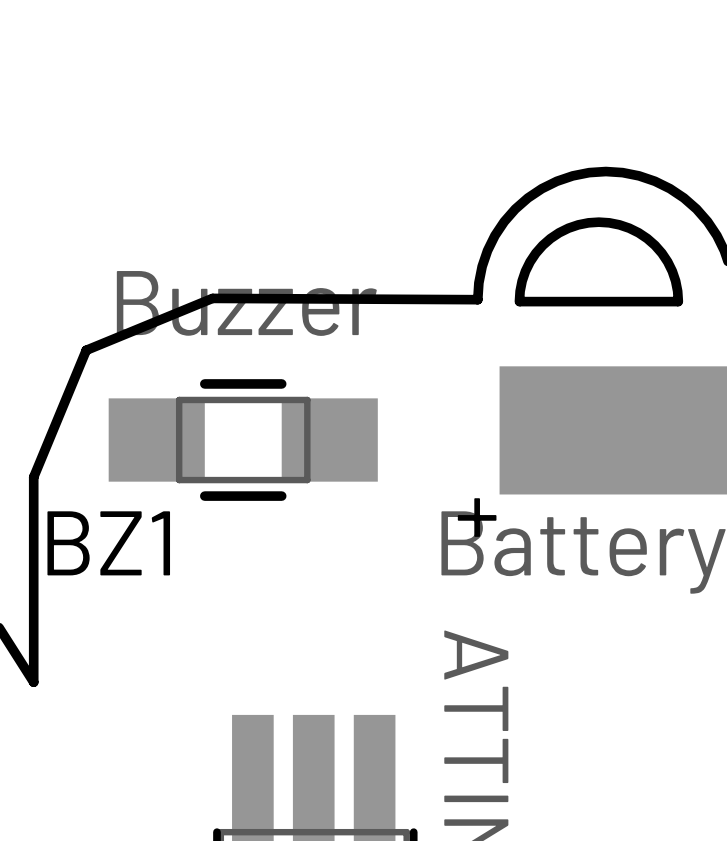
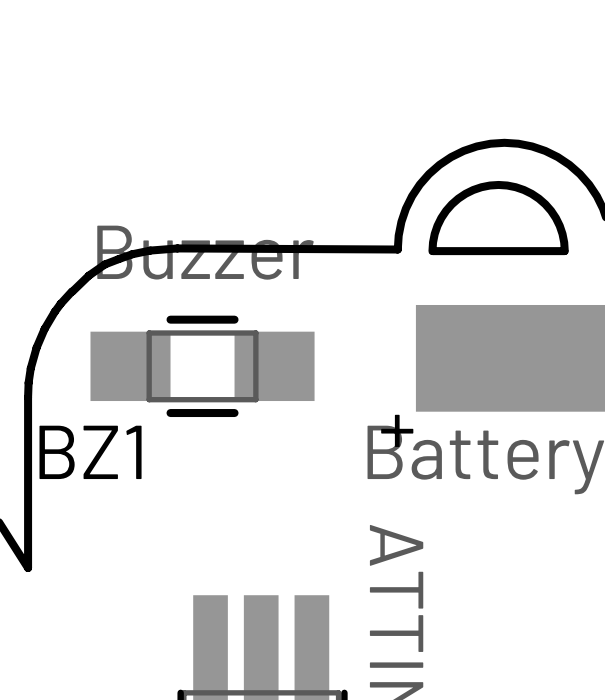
board edge: (212, 298) (86, 350) (33, 477) -> (71, 291) (54, 311) (36, 347) (30, 368) (28, 397)
board edge: none -> (177, 248) (132, 254) (104, 264) (88, 275) (72, 291)

